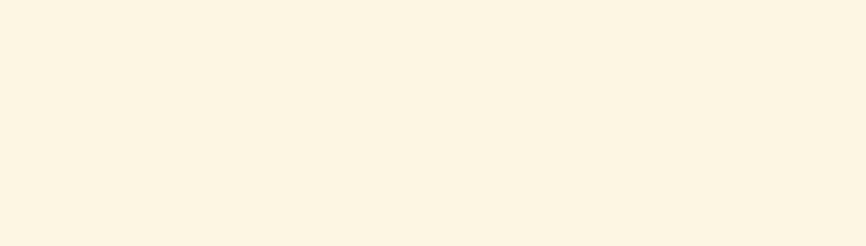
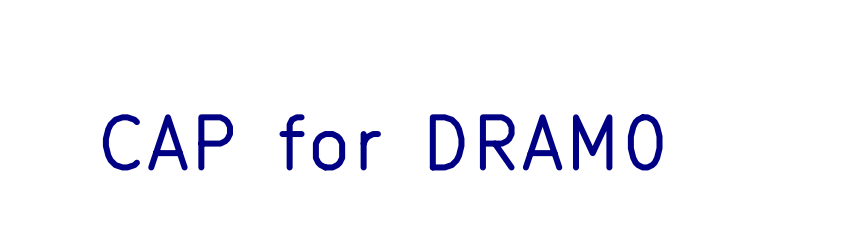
text: none -> CAP for DRAM0 (382, 142)

